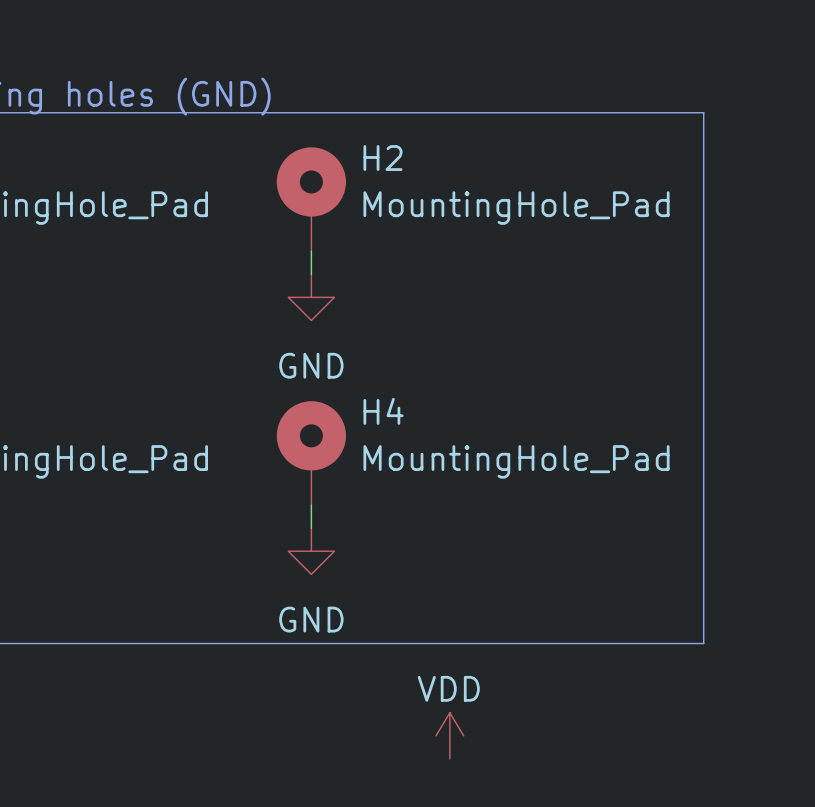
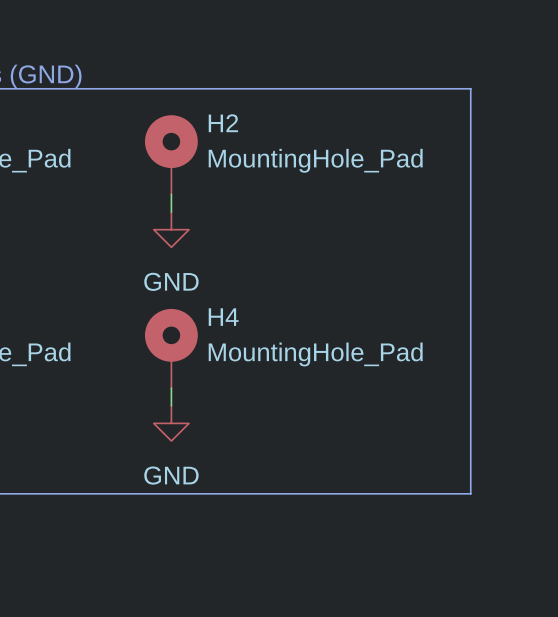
power symbol: VDD (449, 735) -> none

